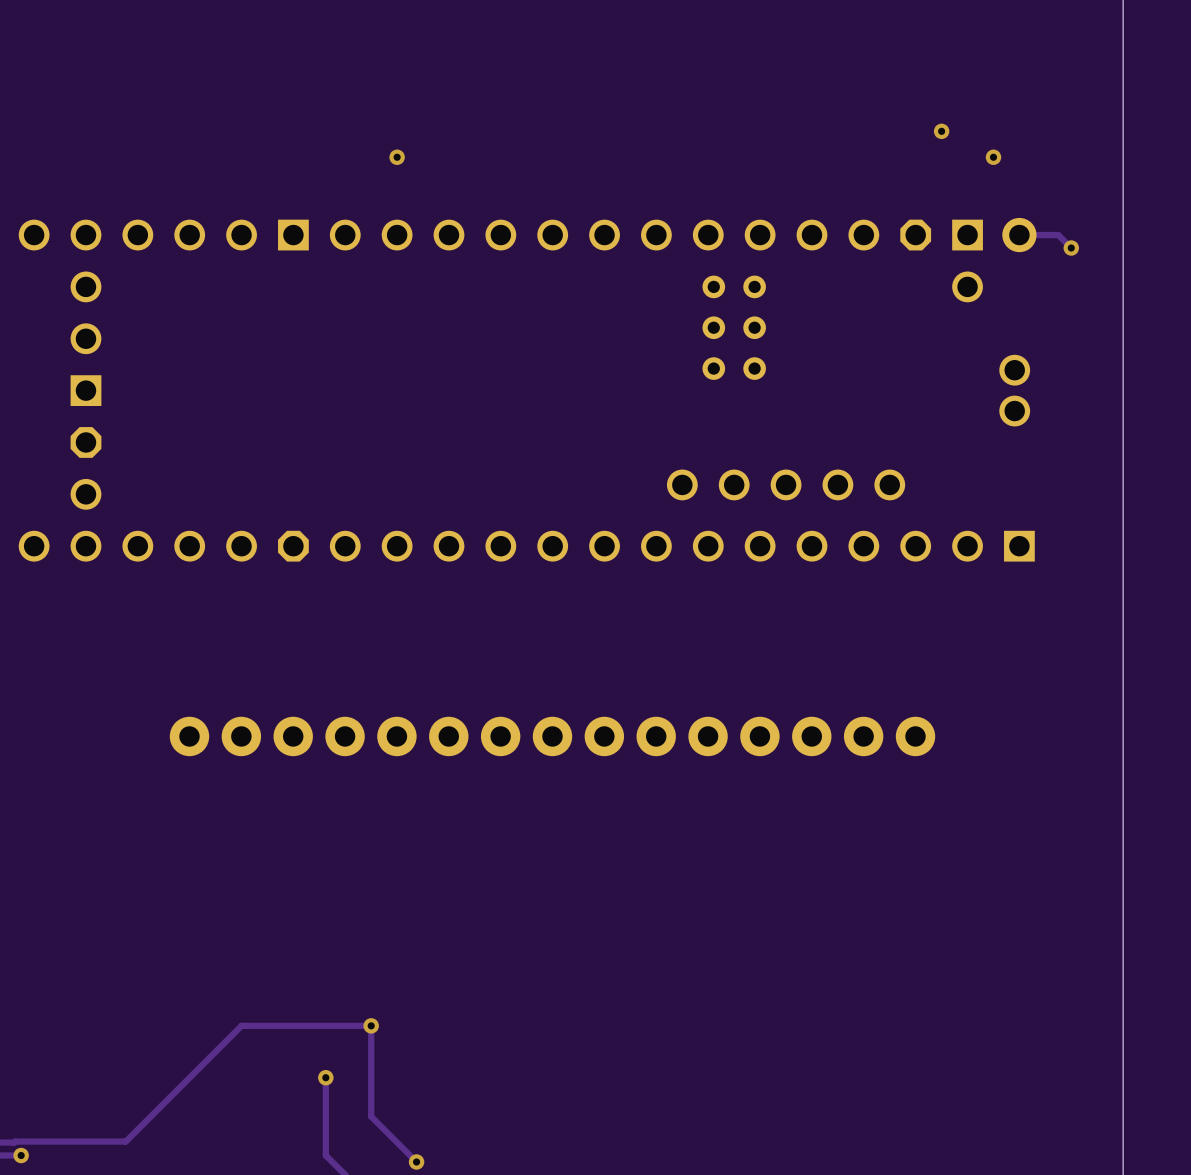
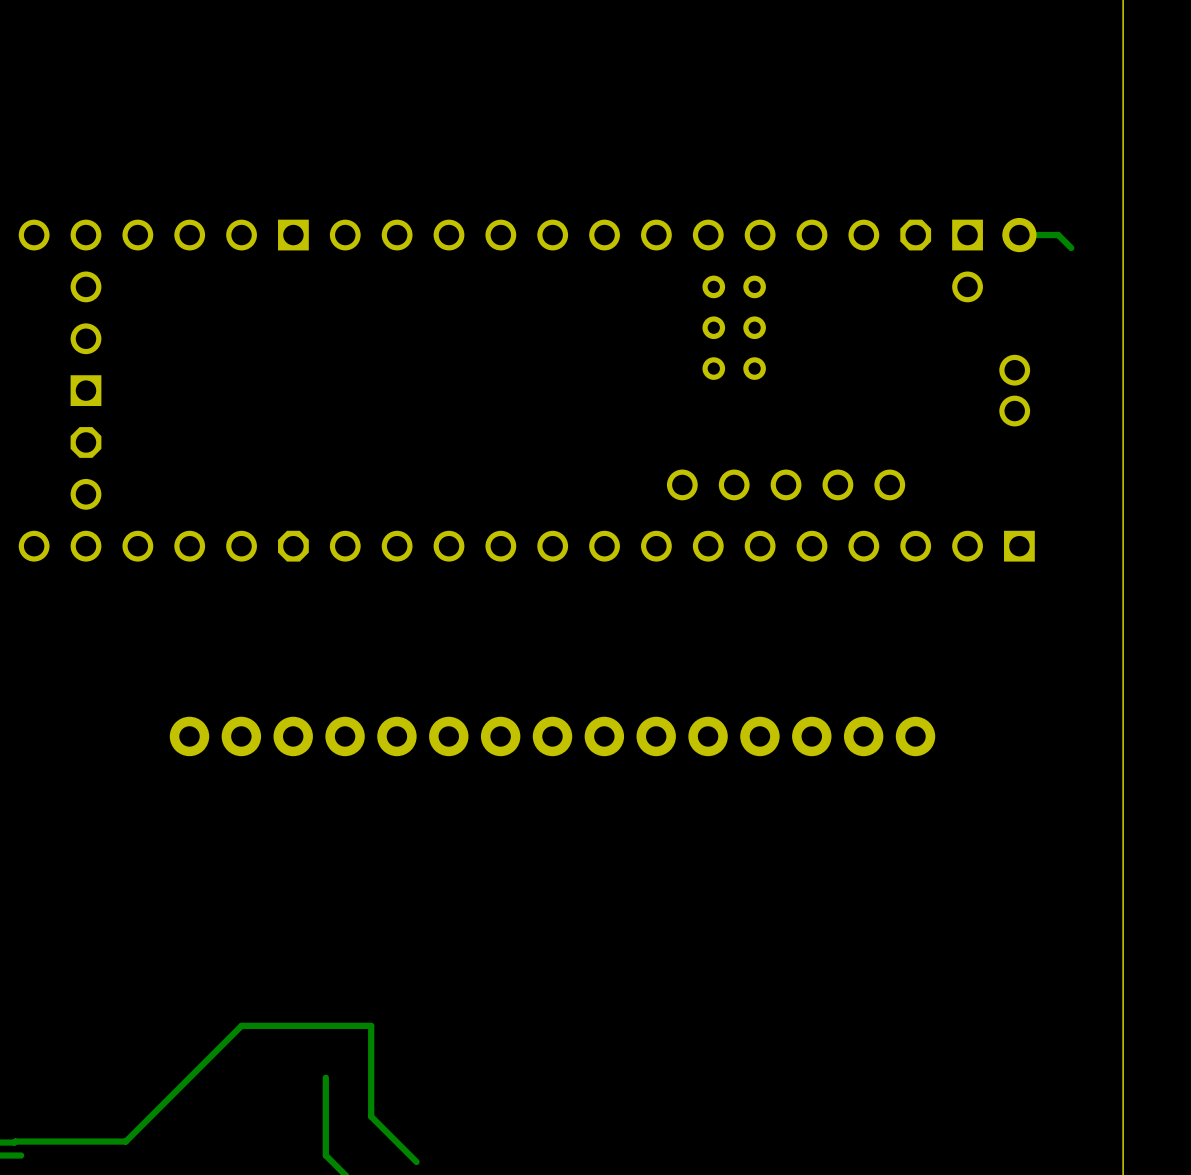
via: (941, 131) -> none
via: (397, 157) -> none
via: (993, 157) -> none
via: (1071, 248) -> none
via: (371, 1025) -> none
via: (325, 1077) -> none
via: (21, 1155) -> none
via: (416, 1161) -> none

